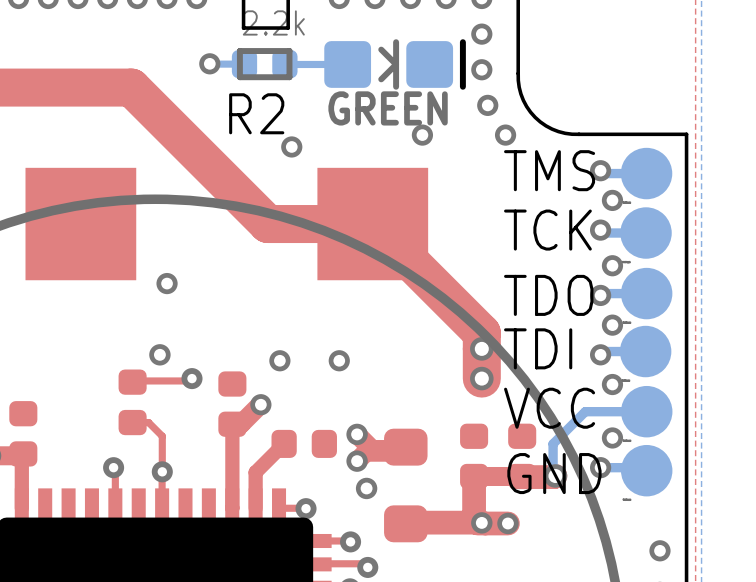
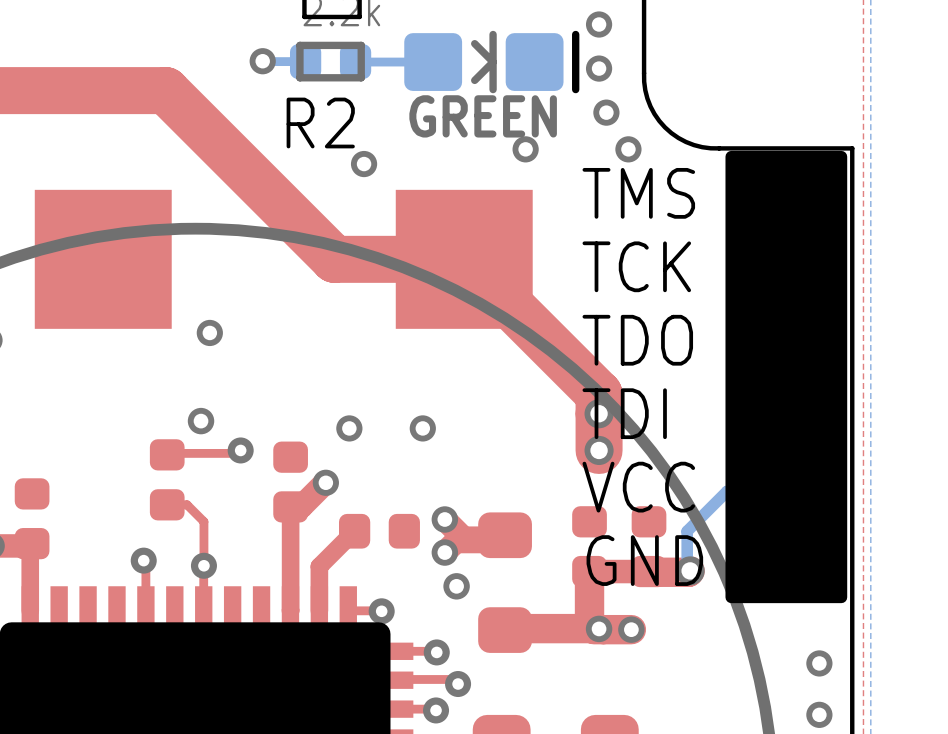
drawing: none -> [725, 150, 848, 604]
text position: TMS (549, 170) -> TMS (638, 193)
text position: TCK (547, 230) -> TCK (636, 266)
text position: TDO (548, 295) -> TDO (637, 340)
text position: TDI (538, 348) -> TDI (624, 413)
text position: VCC (549, 408) -> VCC (638, 487)
text position: GND (554, 473) -> GND (644, 560)

